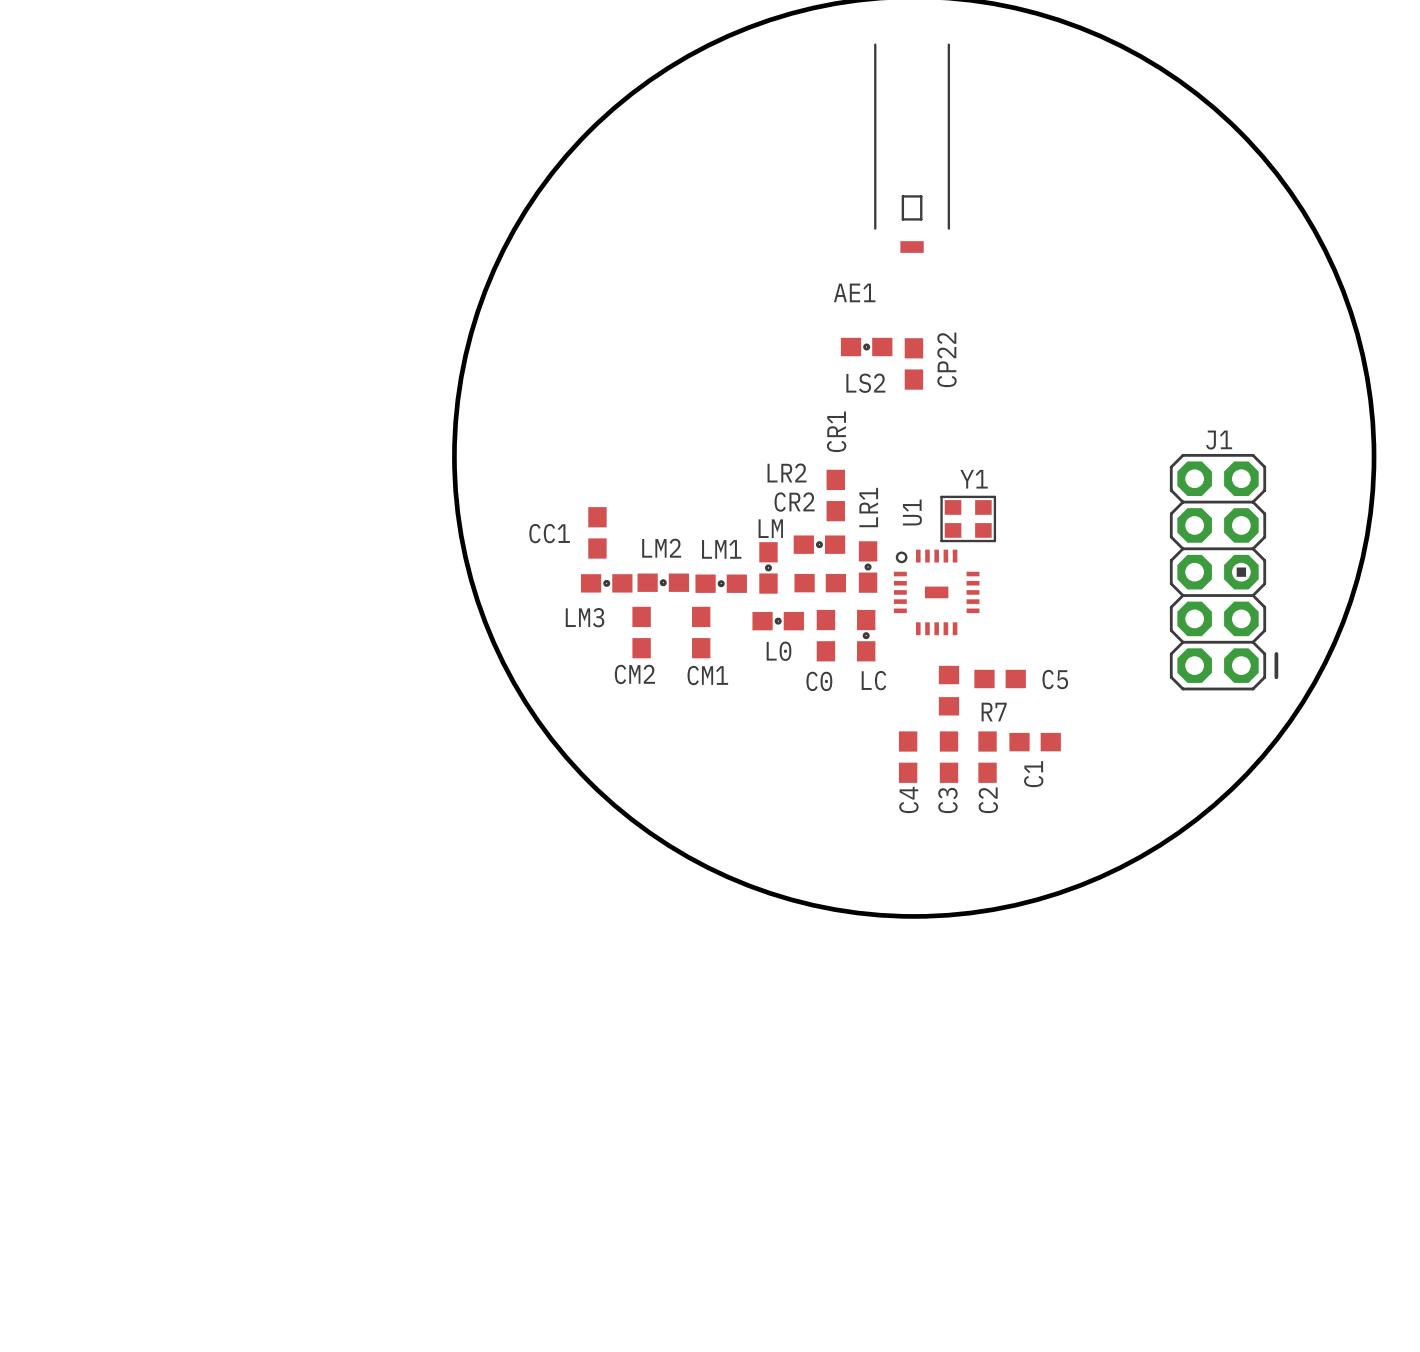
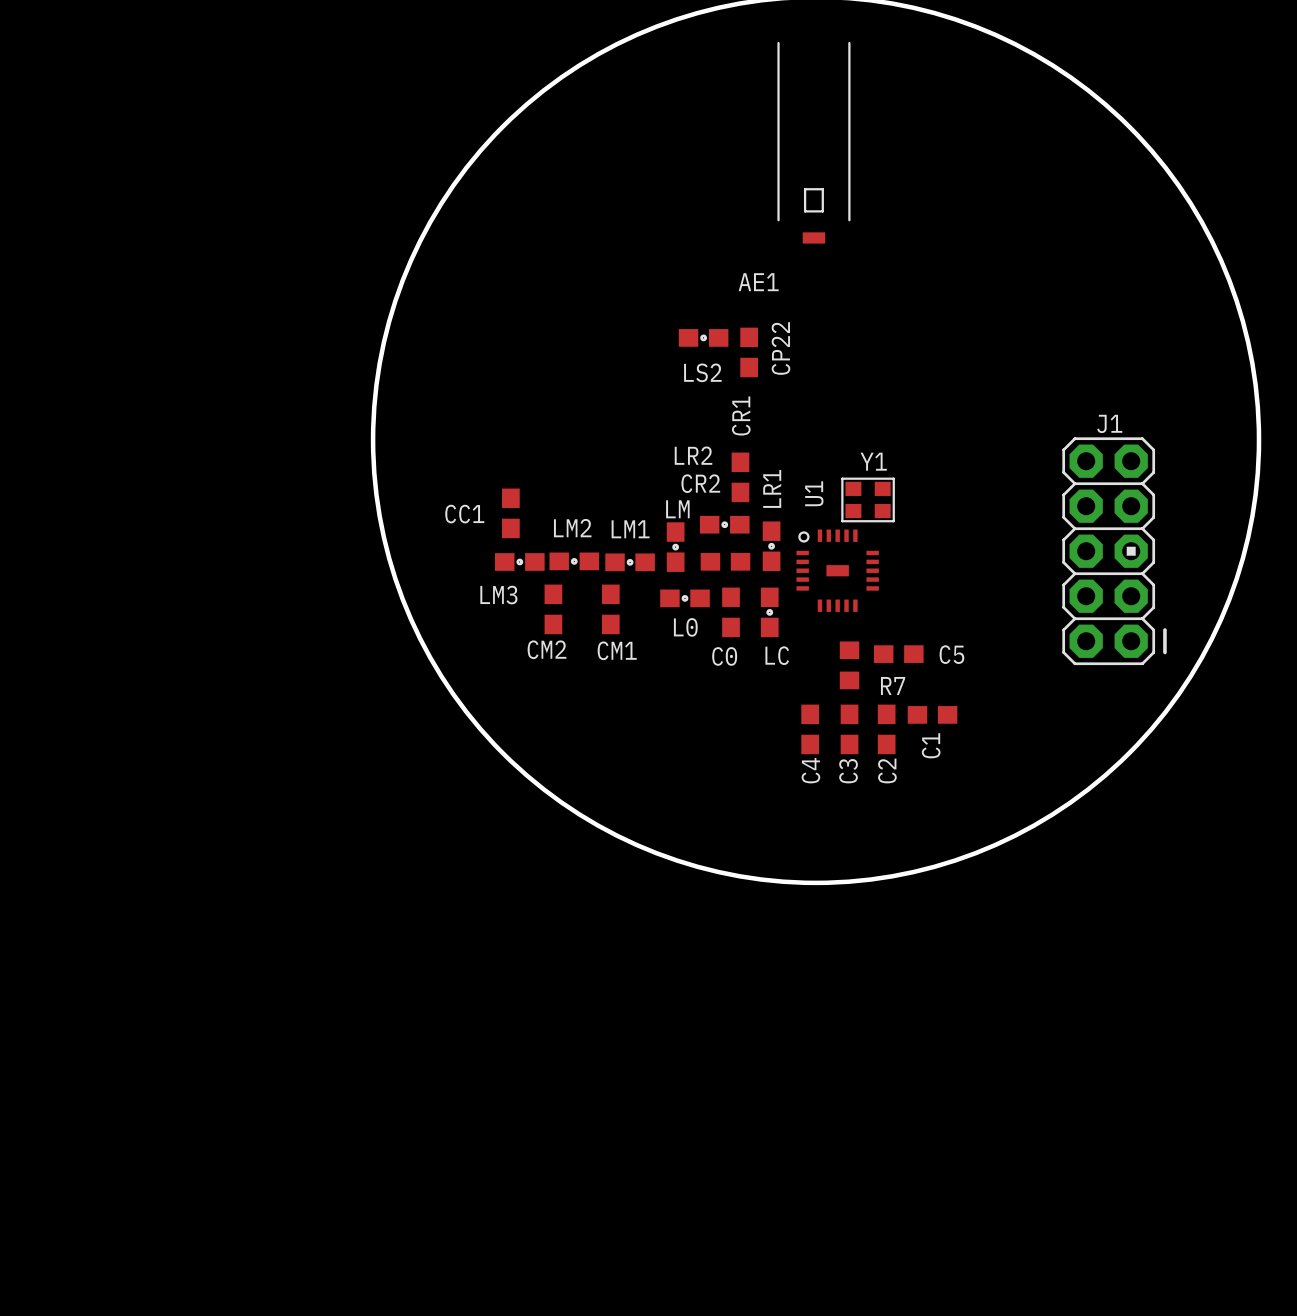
LS2 position: (866, 347) -> (703, 337)
CP22 position: (913, 363) -> (749, 352)

